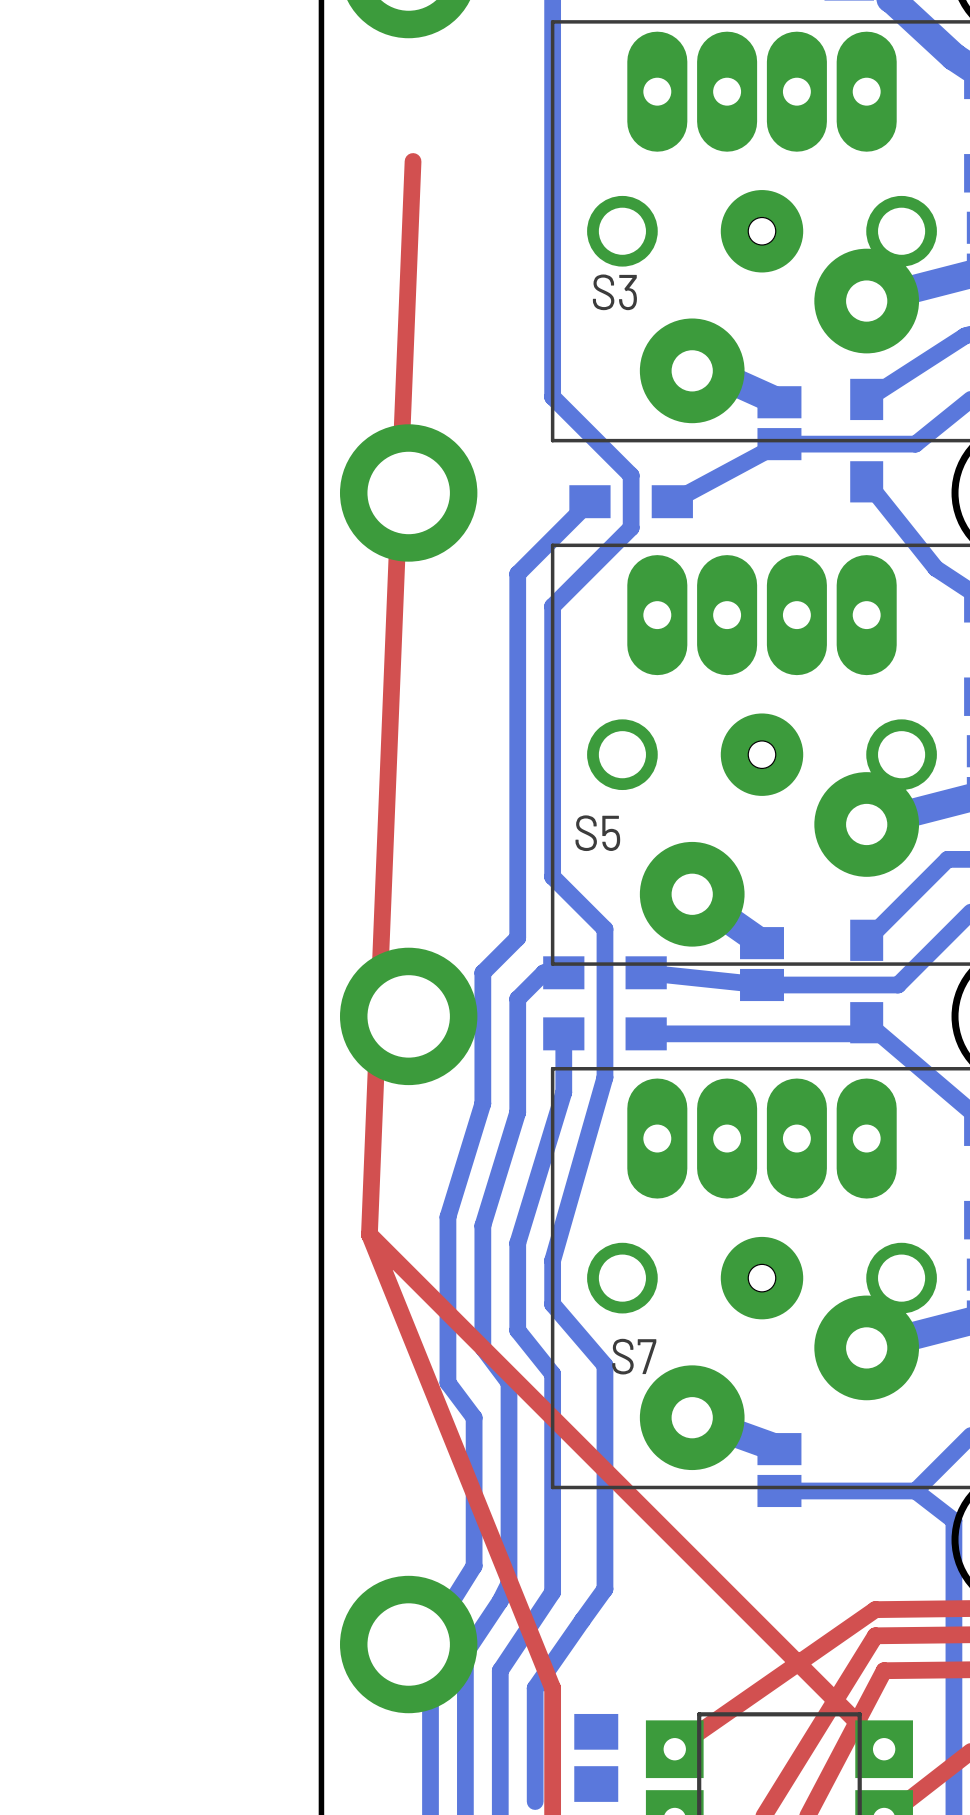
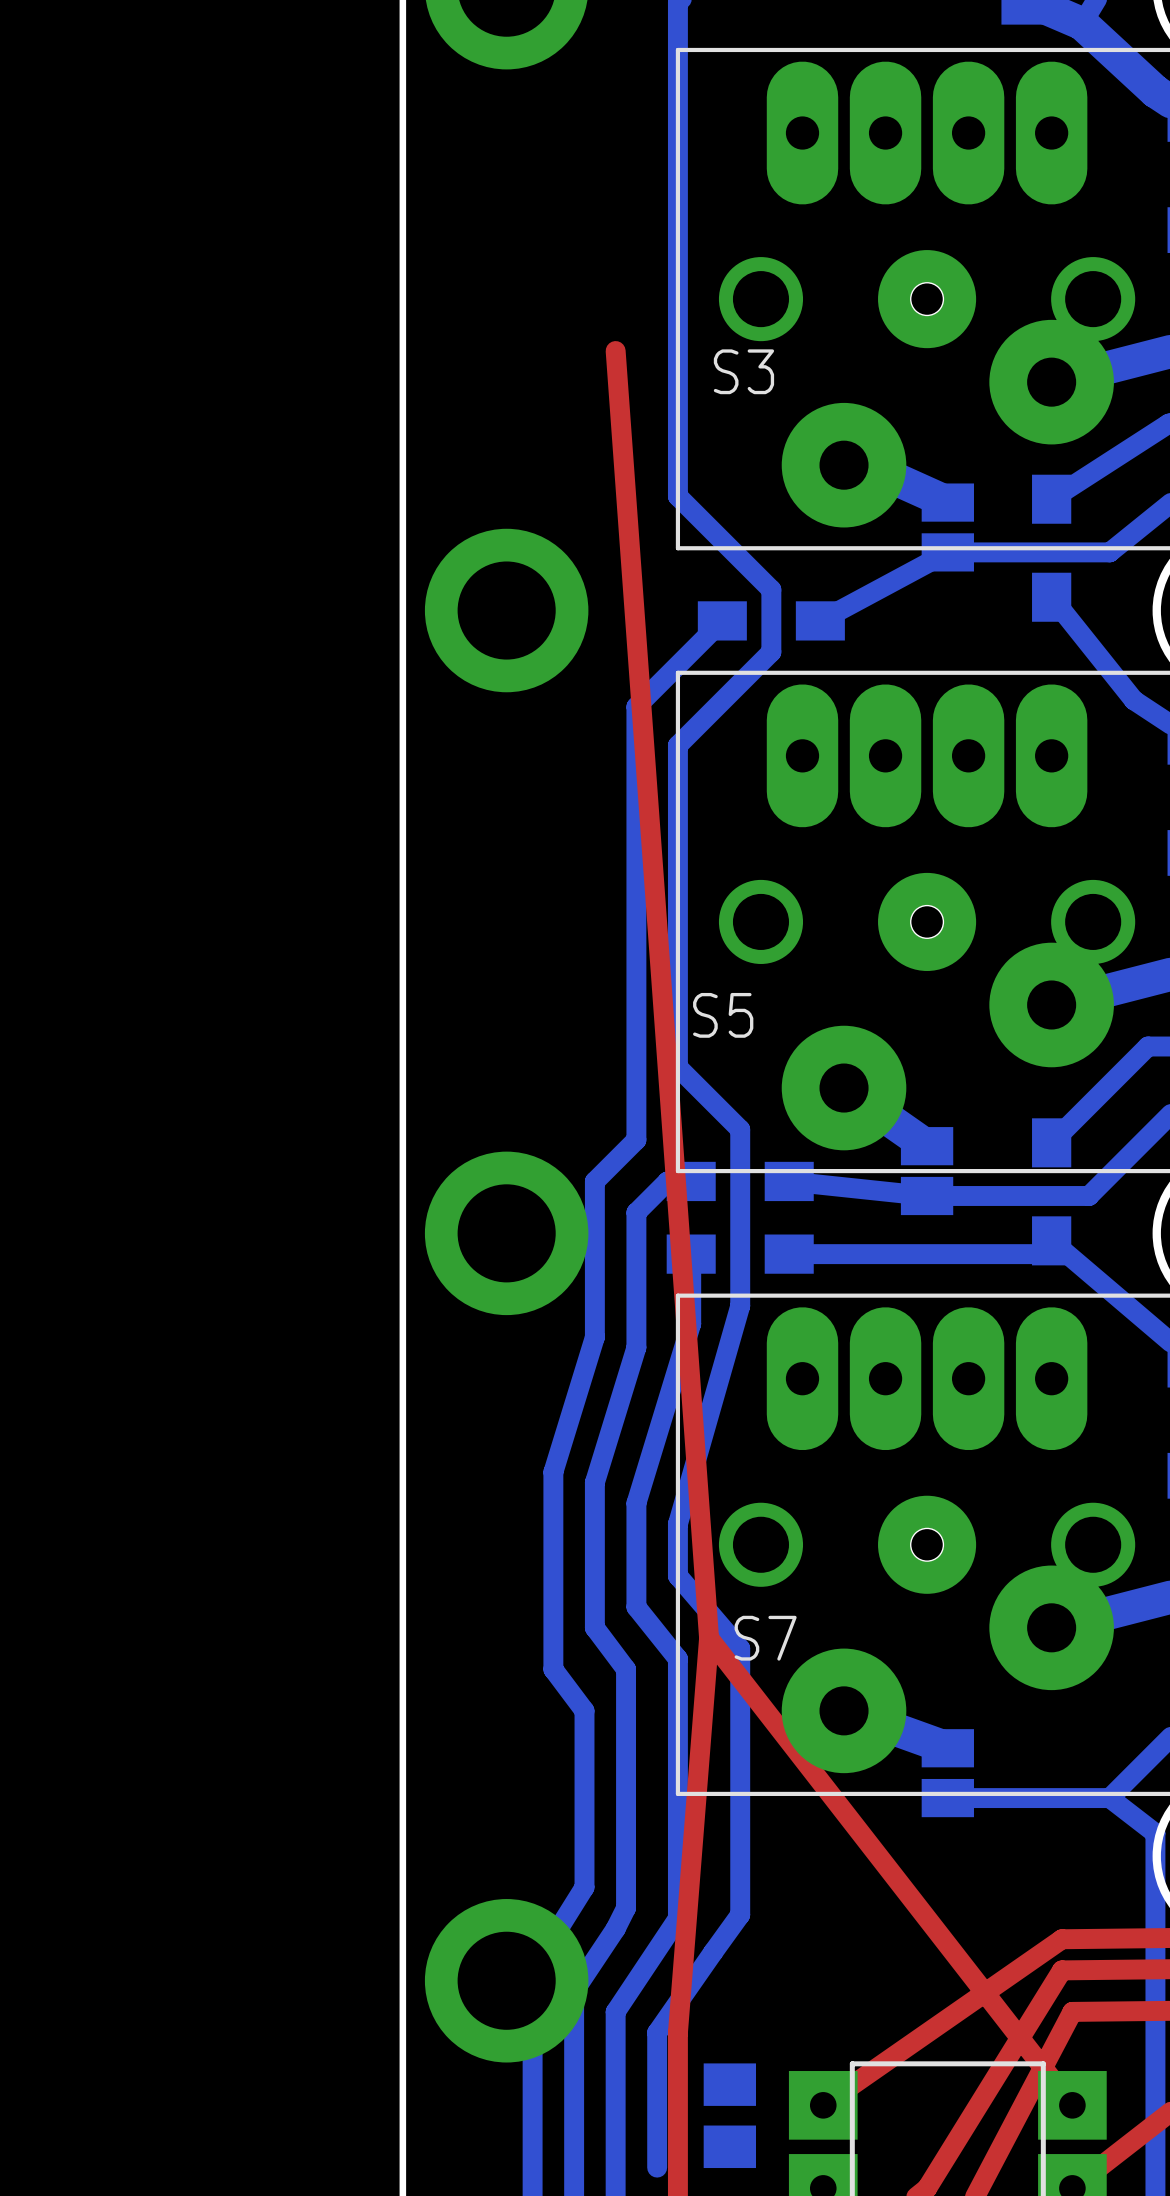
top track: (413, 161) (369, 1234) -> none
top track: none -> (615, 351) (709, 1638)
top track: (369, 1234) (884, 1749) -> (709, 1638) (1072, 2105)
top track: (369, 1234) (552, 1688) -> (709, 1638) (677, 2032)

